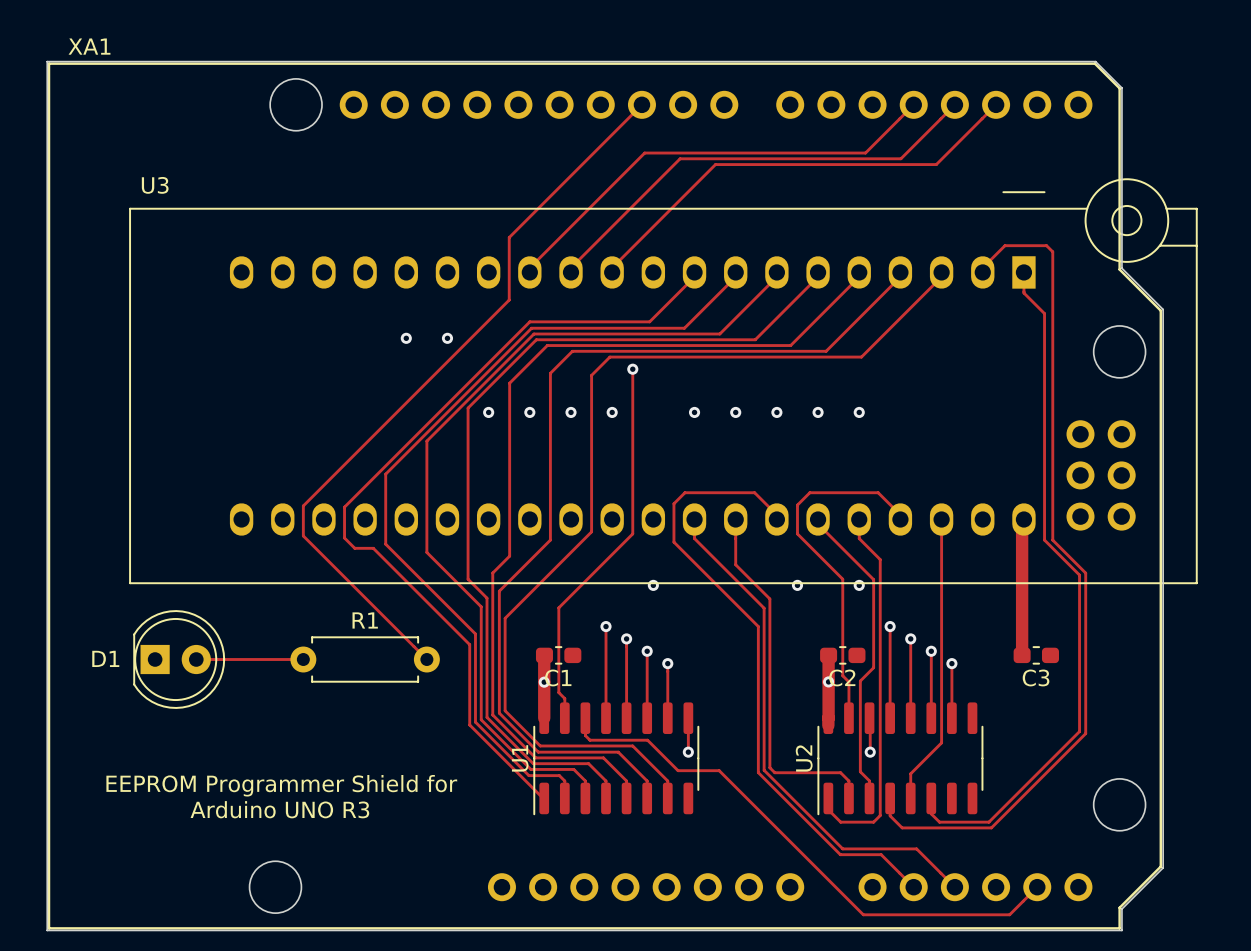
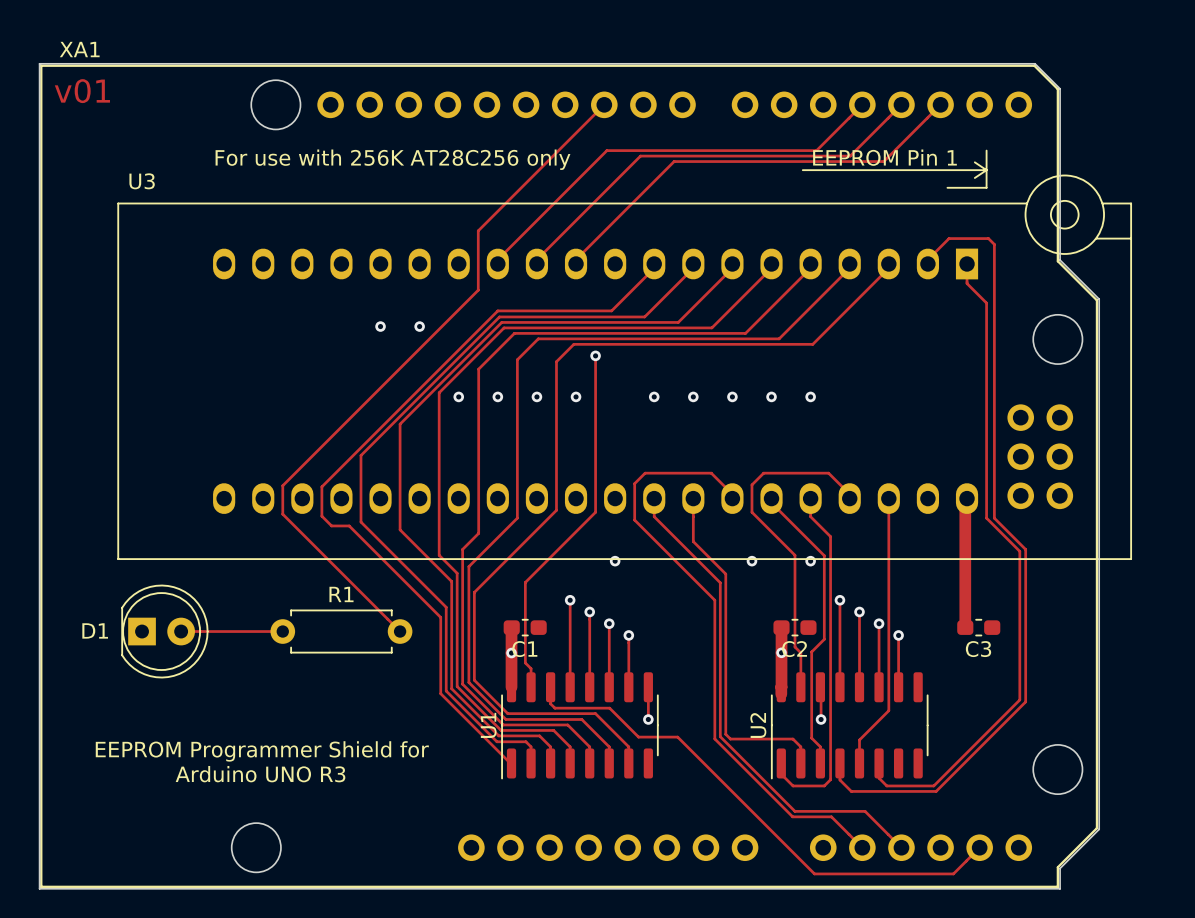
text: none -> v01 (82, 91)
line: none -> (986, 150) (986, 187)
text: none -> EEPROM Pin 1 (884, 157)
text: none -> For use with 256K AT28C256 only (392, 159)
line: none -> (974, 162) (986, 170)
line: none -> (802, 170) (986, 170)
line: none -> (986, 170) (974, 177)

